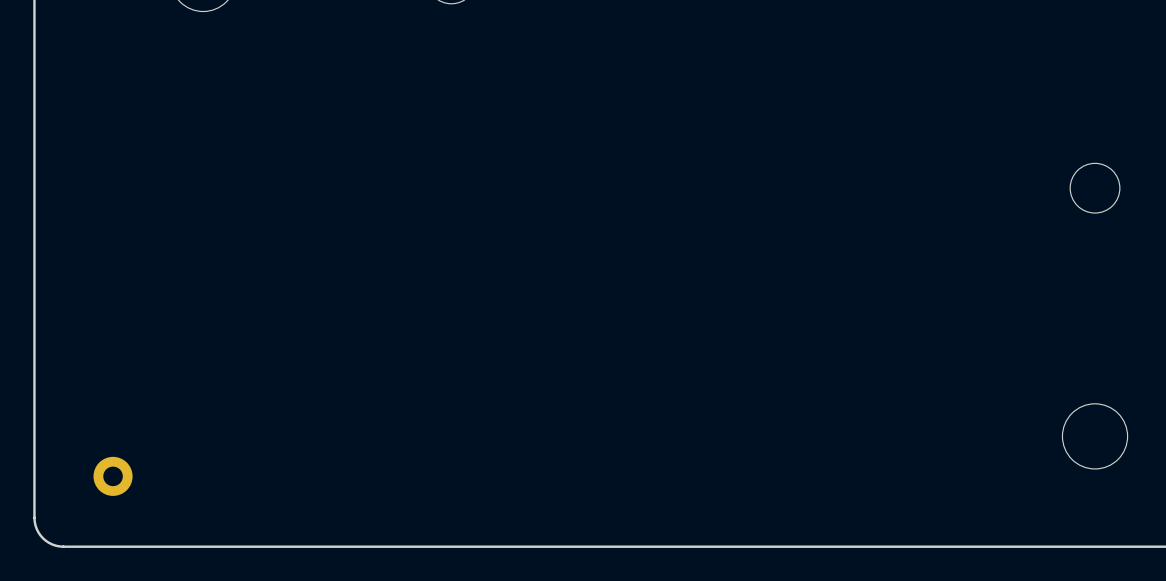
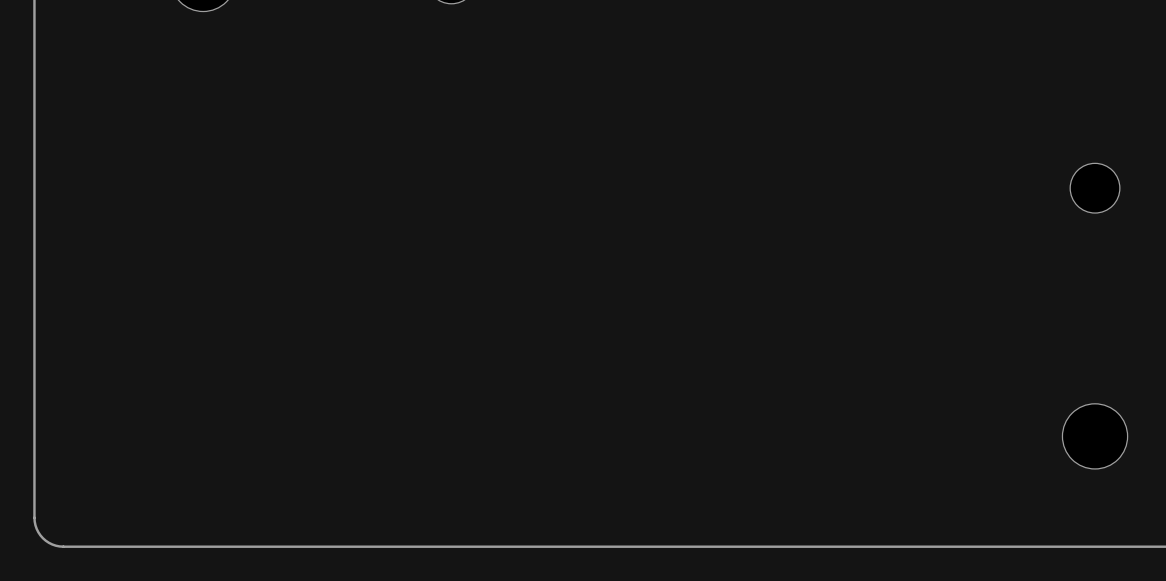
part: (113, 476) -> none

